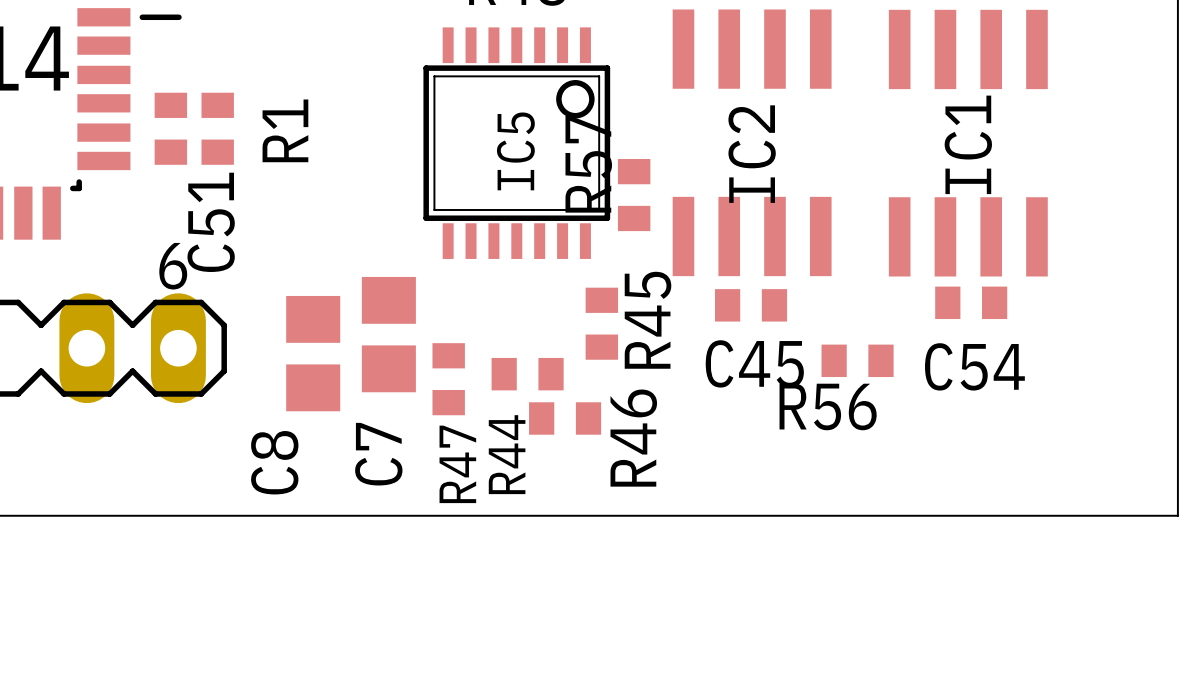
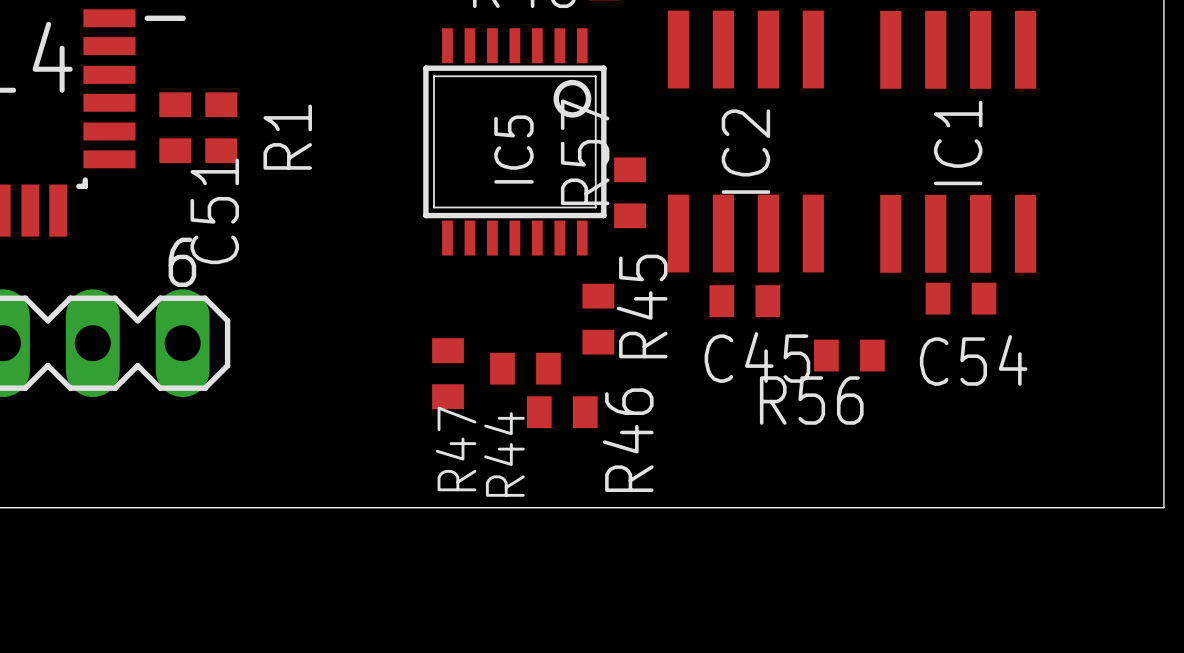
C7: (388, 334) -> none
C8: (313, 353) -> none

